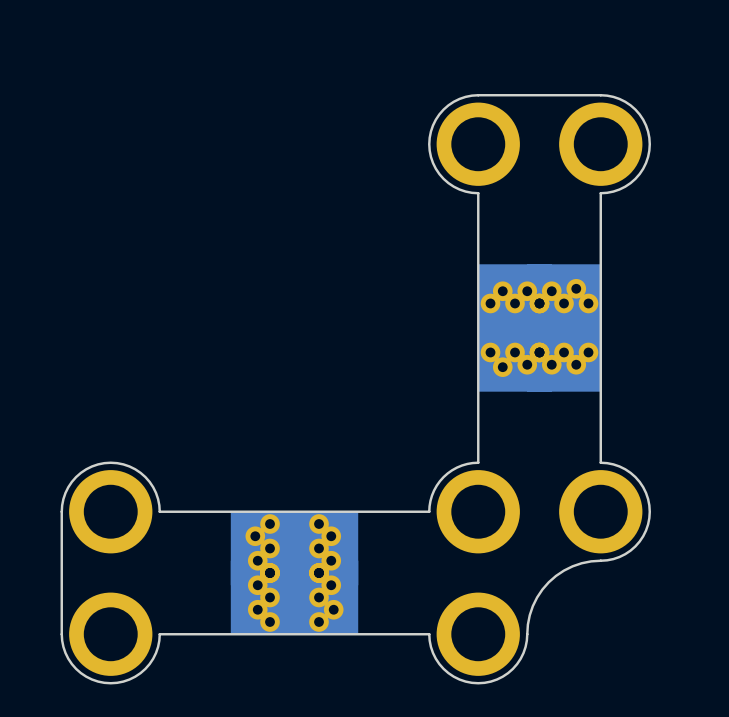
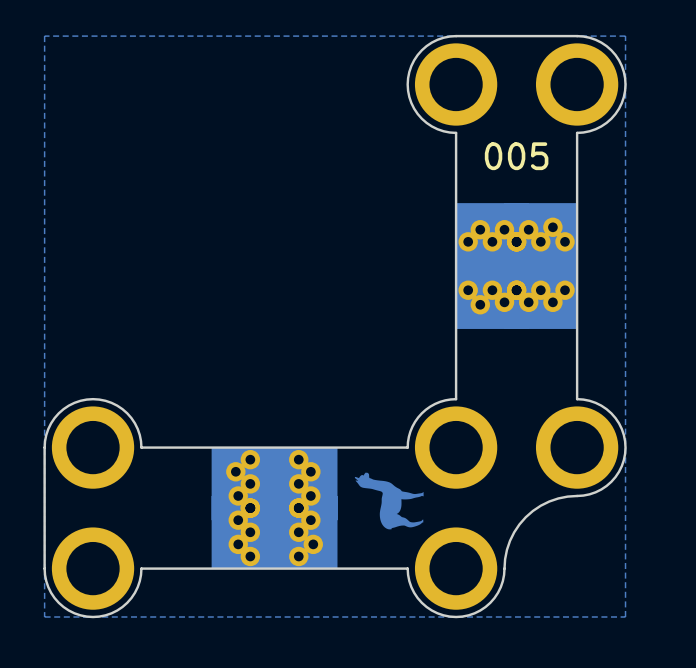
zone outline: none -> (625, 36) (625, 617) (44, 617) (44, 36) (625, 36)
text: none -> 005 (516, 156)
drawing: none -> [354, 472, 424, 530]

